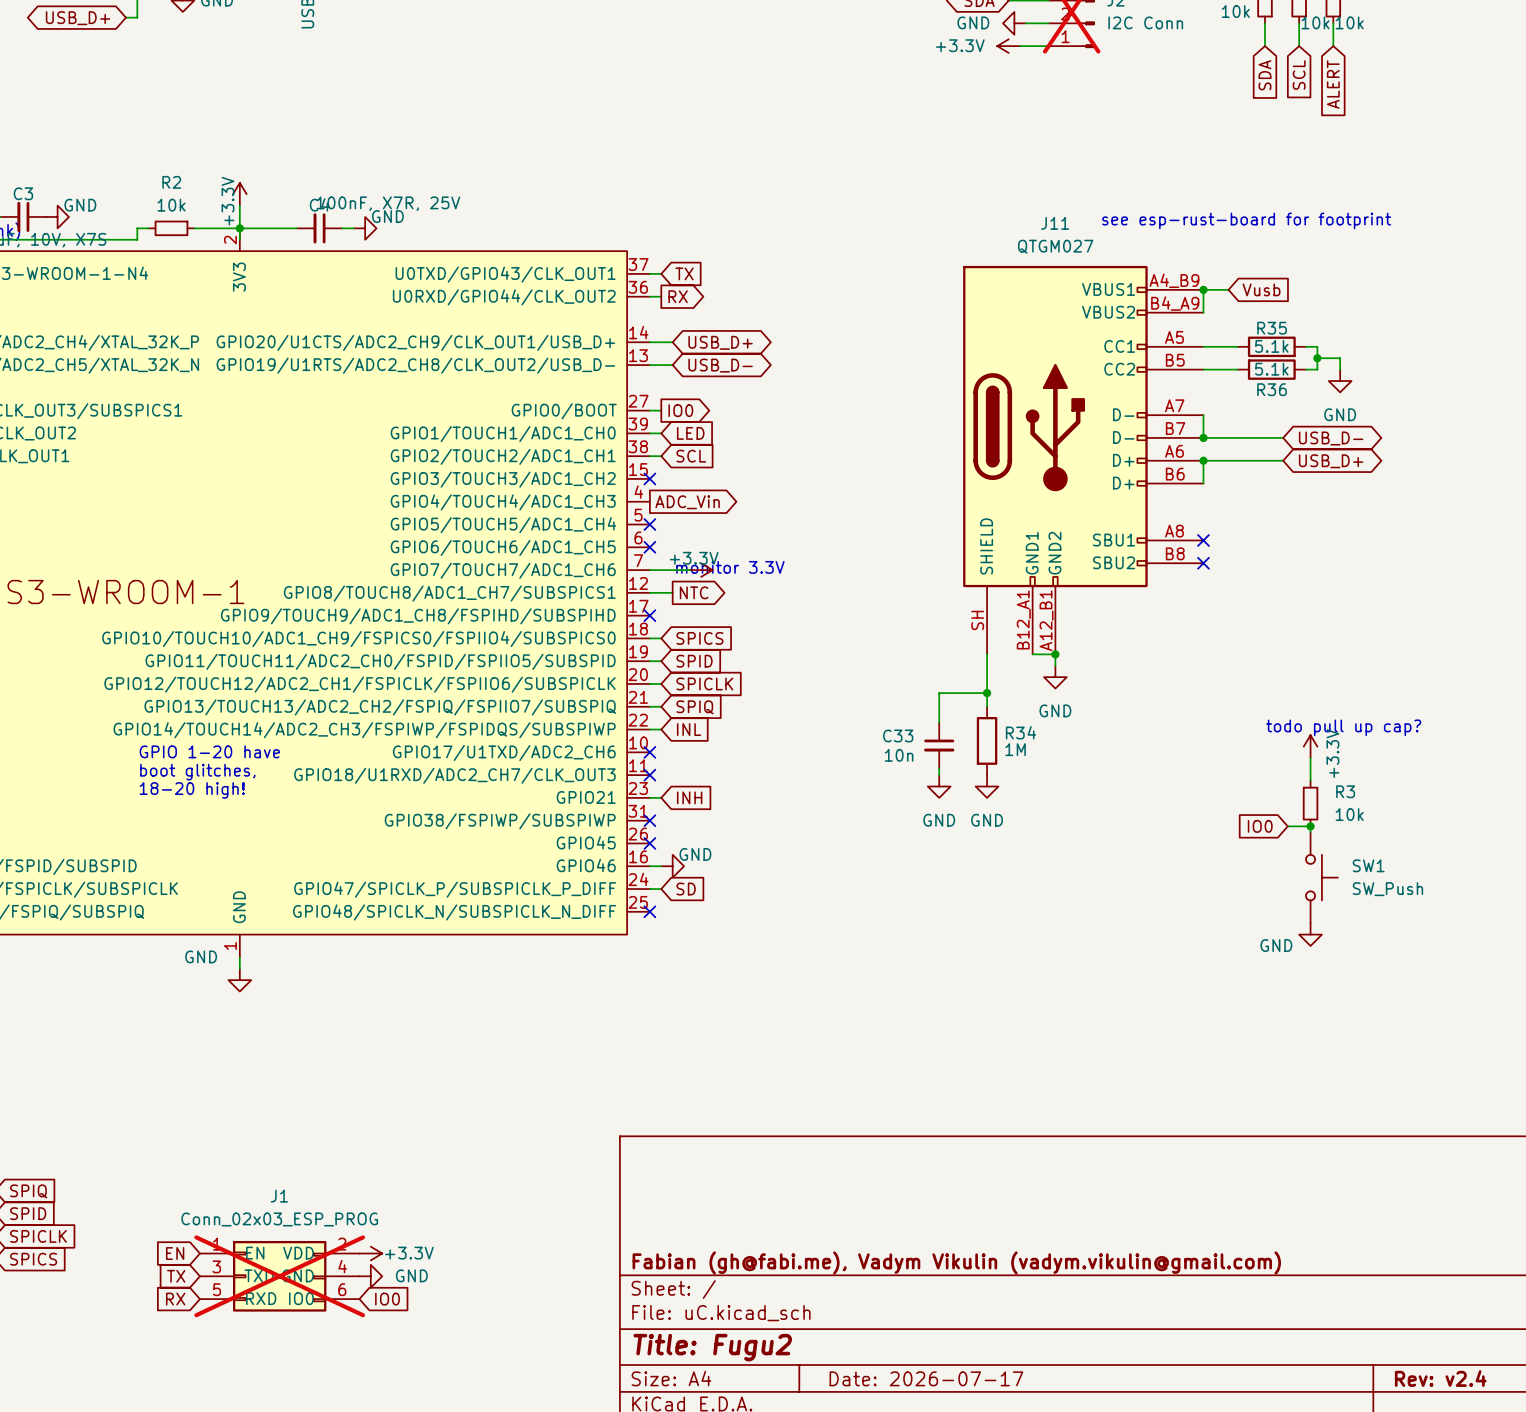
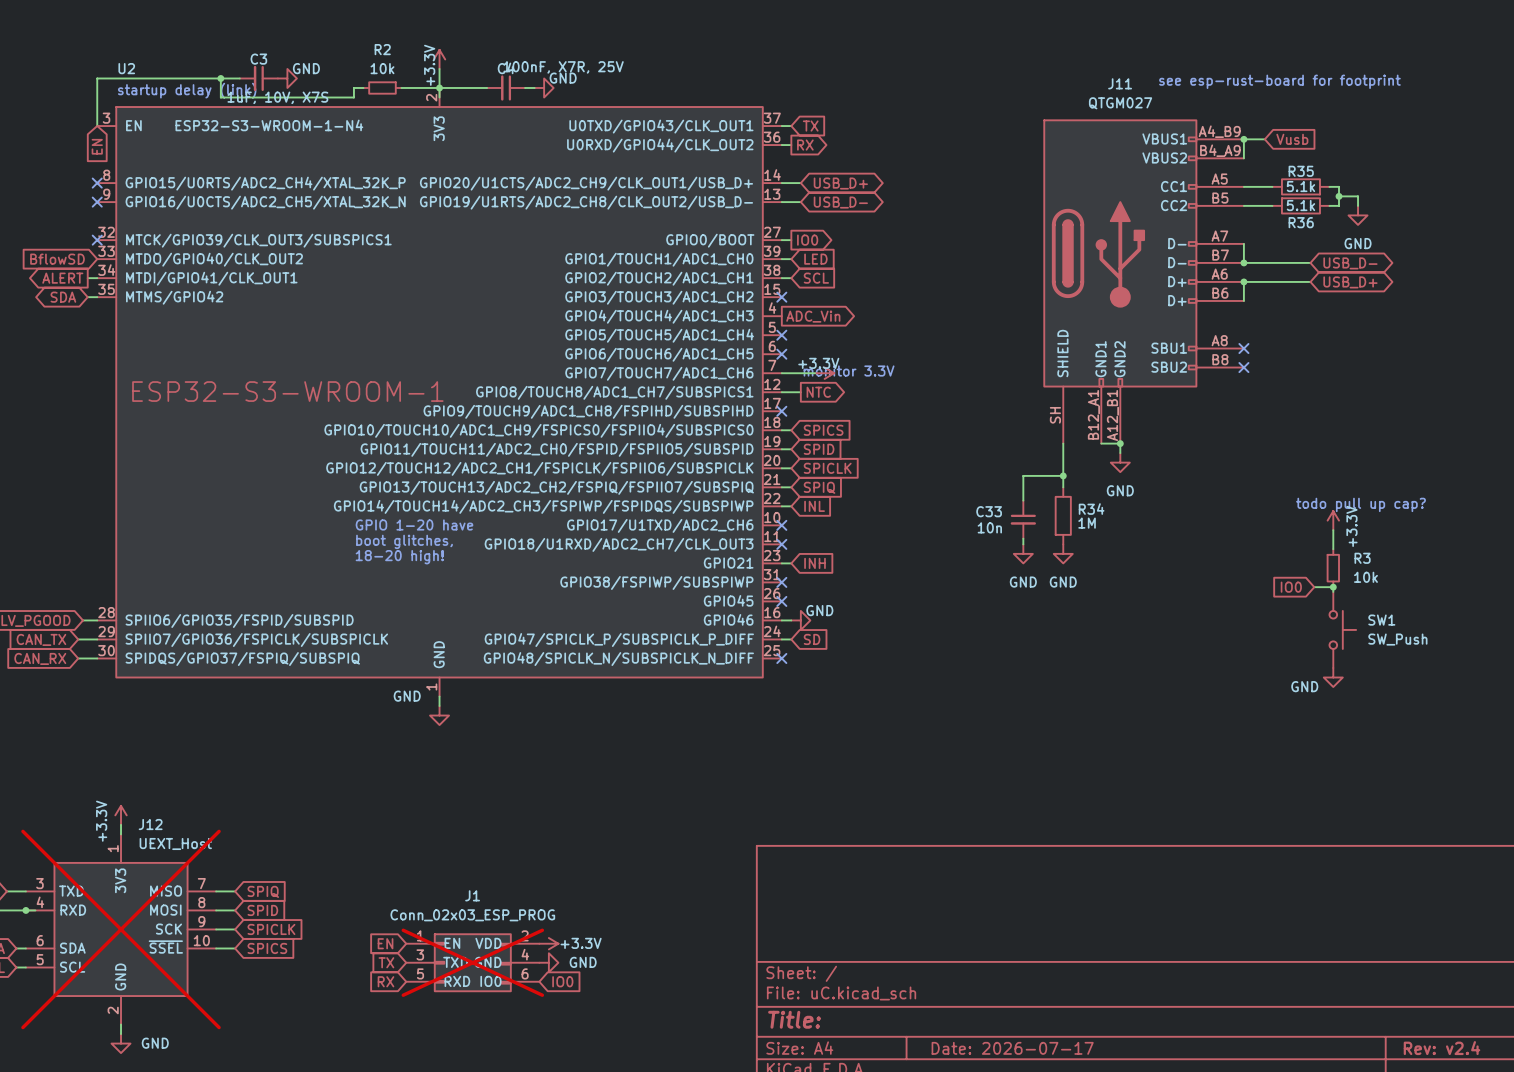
title block: Fabian (gh@fabi.me), Vadym Vikulin (vadym.vikulin@gmail.com) (956, 1262) -> none
title block: Title: Fugu2 (712, 1347) -> Title: (794, 1019)

